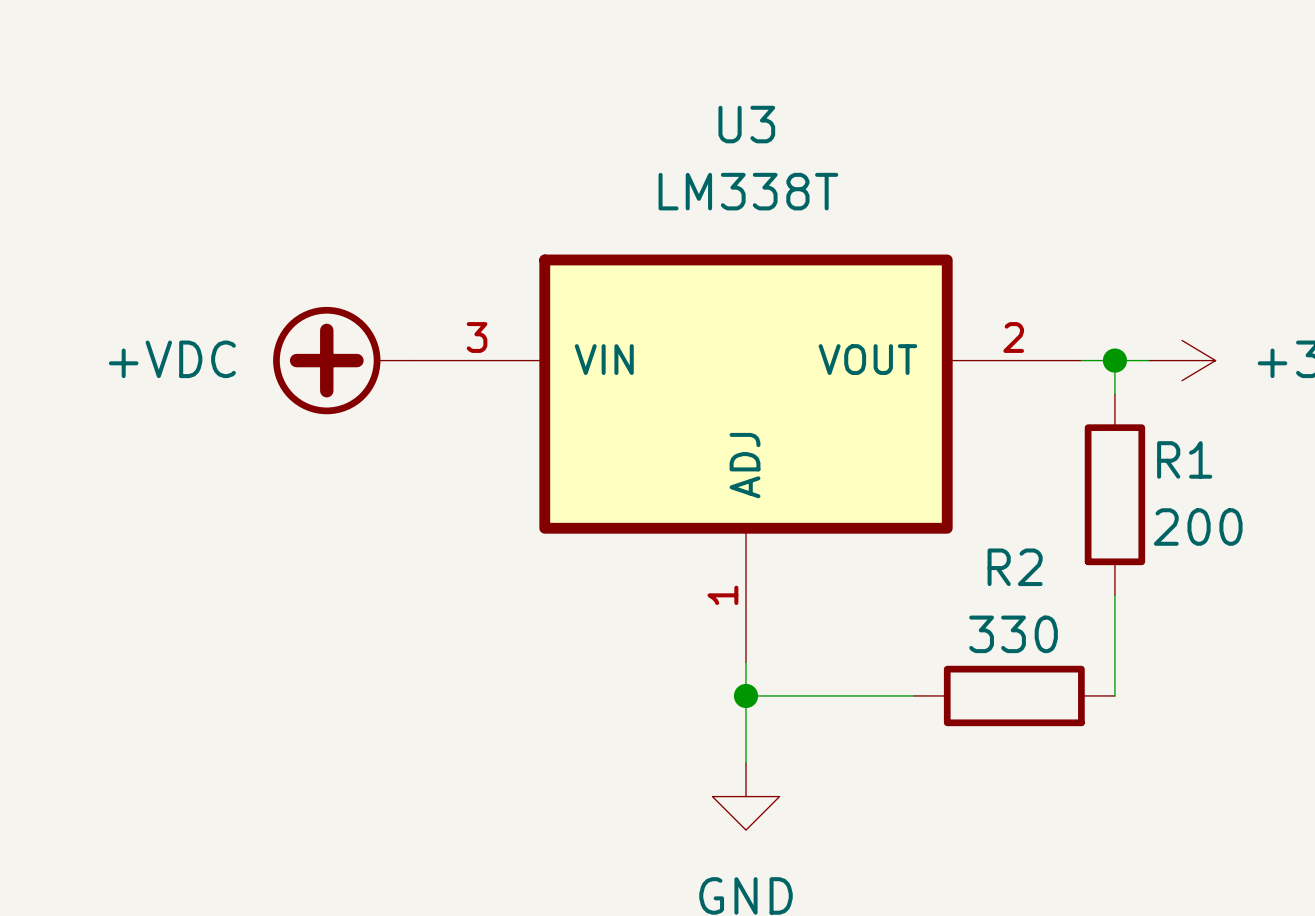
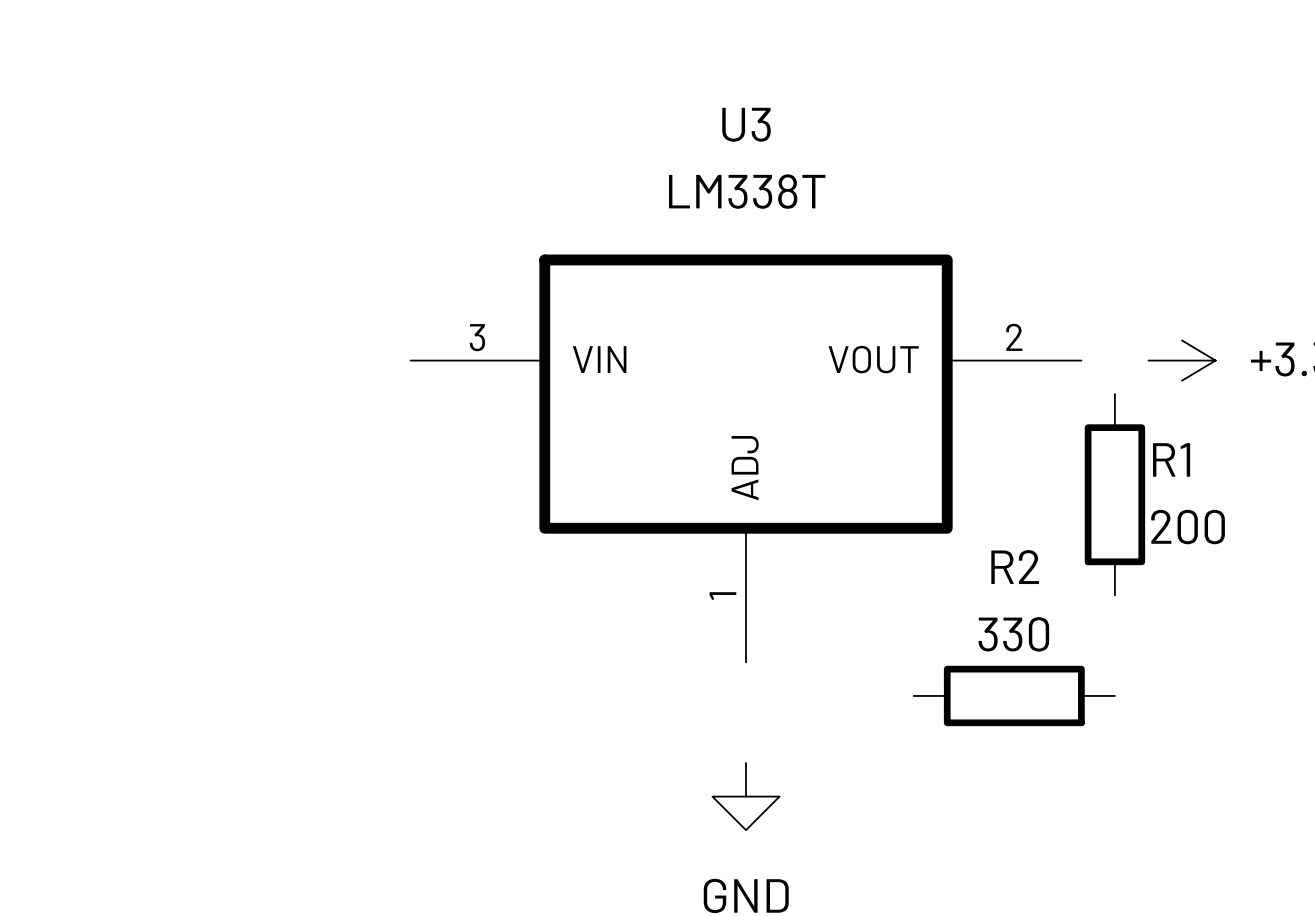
power symbol: +VDC (341, 360) -> none
wire: (1081, 360) (1148, 360) -> none
wire: (1114, 360) (1114, 394) -> none
junction: (1114, 360) -> none
wire: (1114, 595) (1114, 695) -> none
wire: (746, 662) (746, 763) -> none
wire: (746, 695) (913, 695) -> none
junction: (746, 695) -> none

